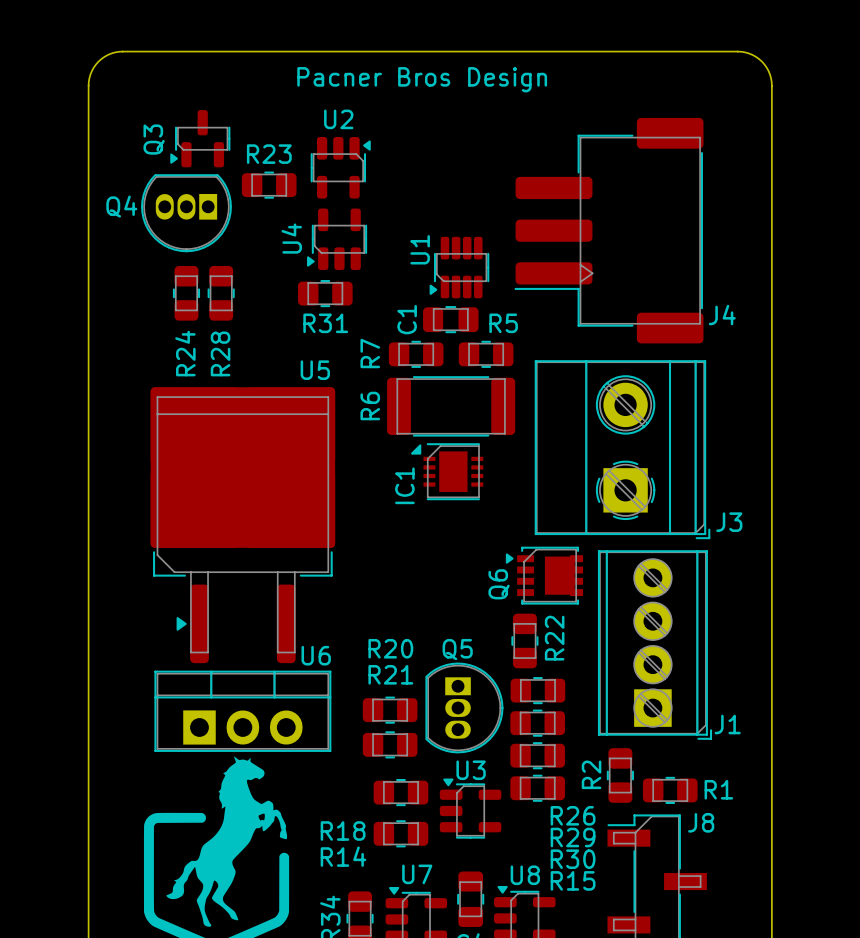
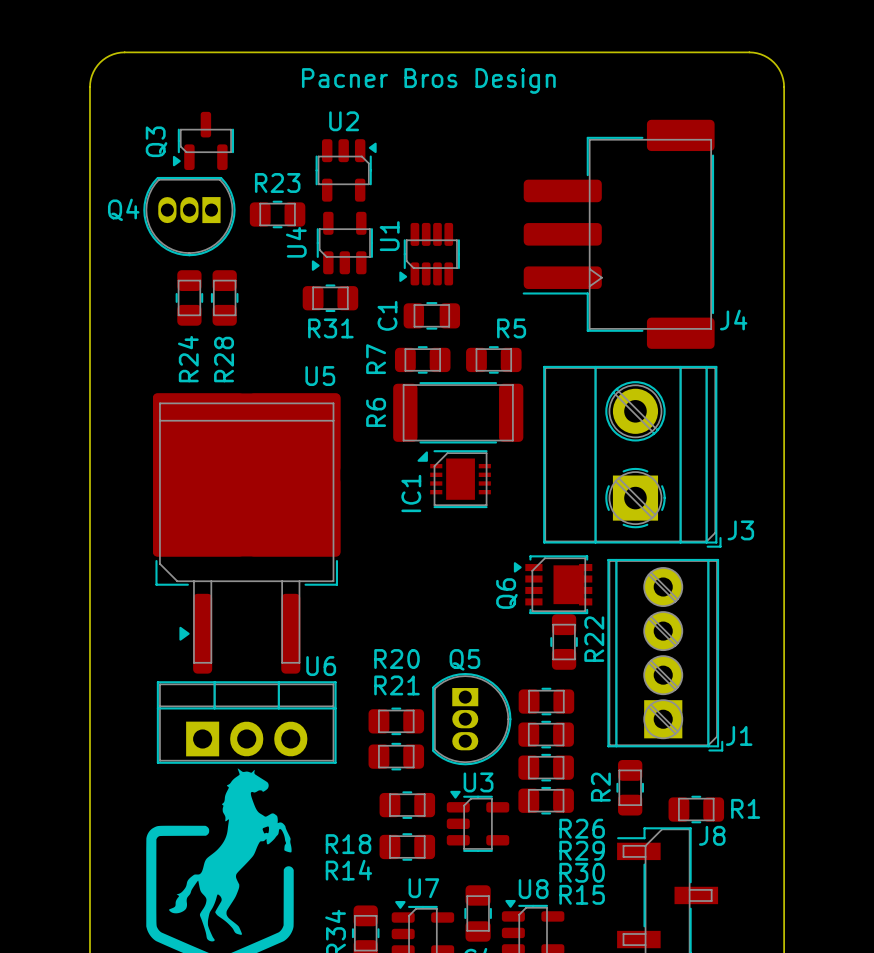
R23 position: (269, 185) -> (277, 214)
U1 position: (459, 267) -> (429, 254)
C1 position: (450, 319) -> (431, 315)
R22 position: (524, 640) -> (564, 642)
R1 position: (670, 790) -> (696, 809)

